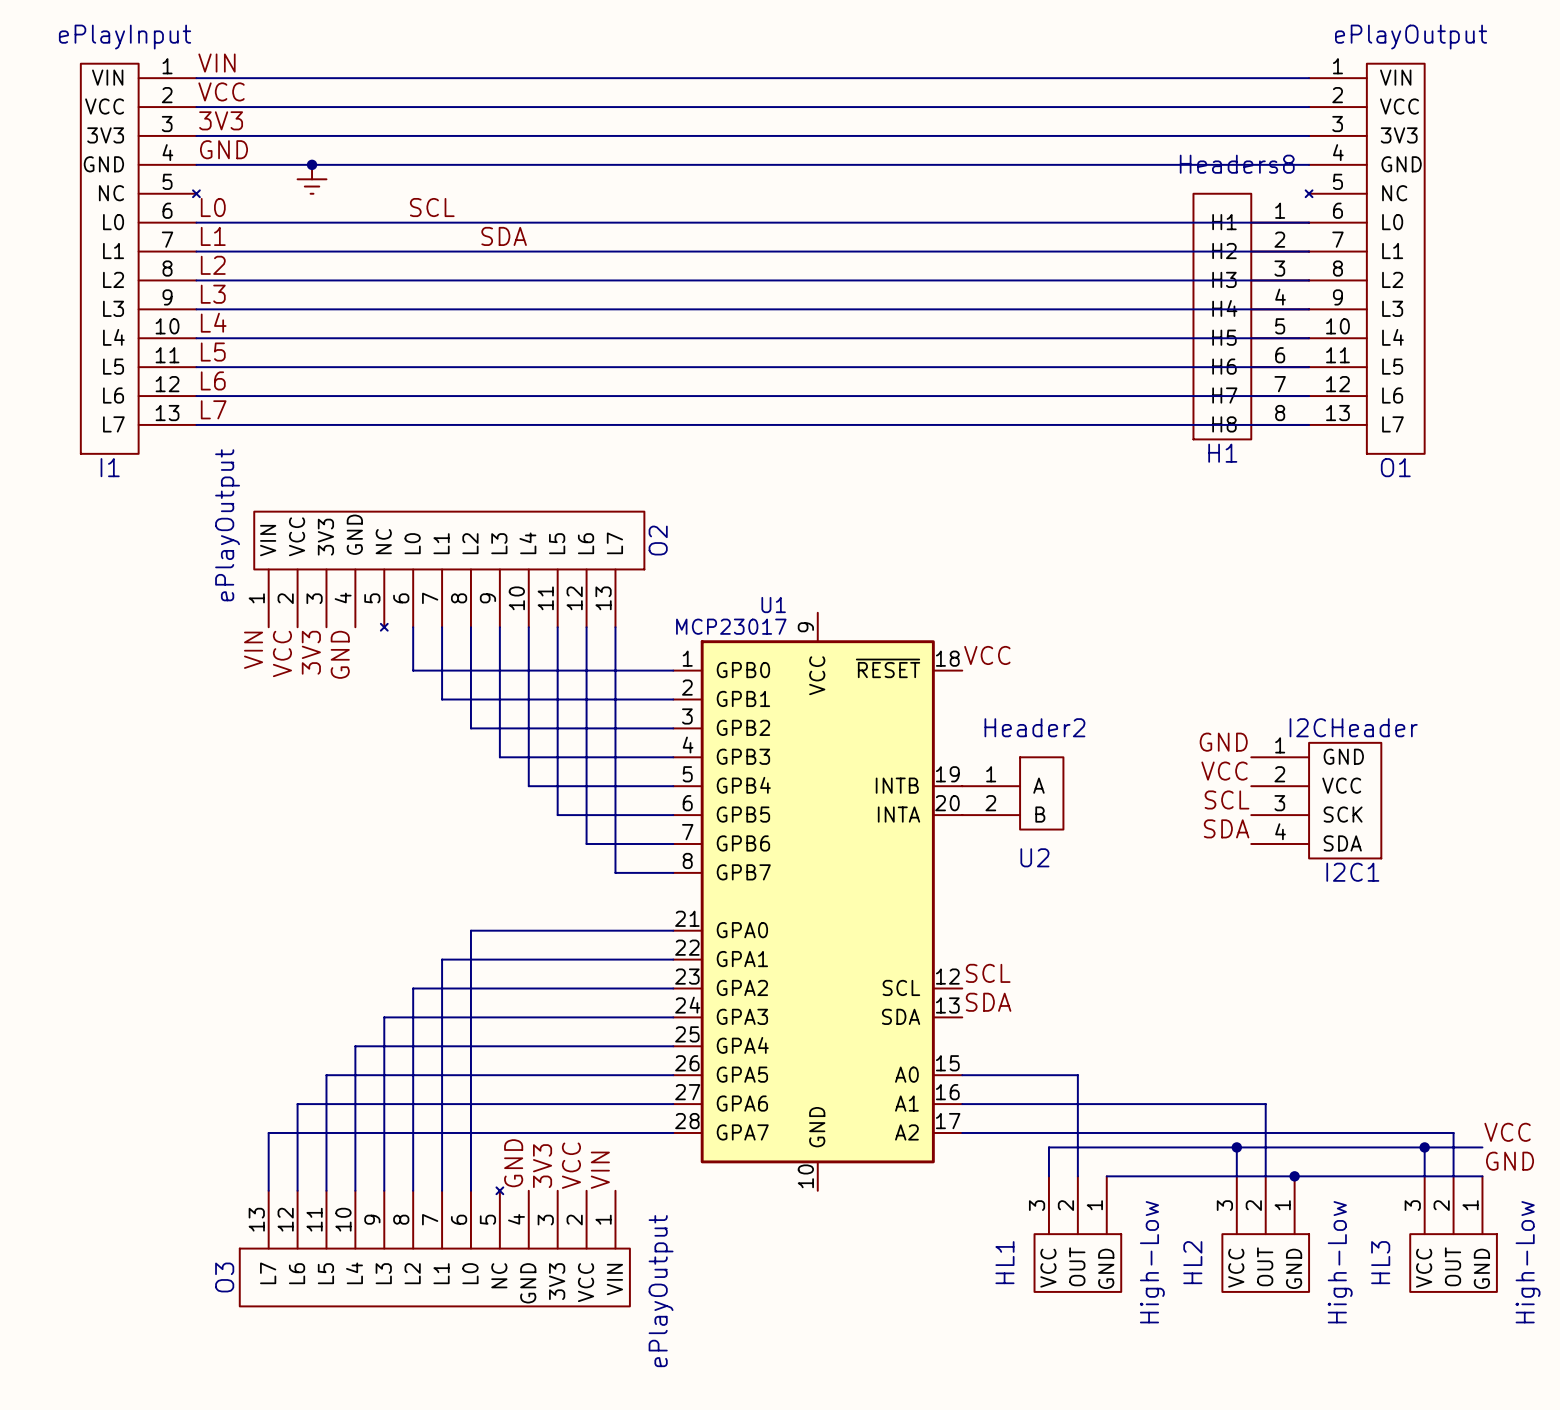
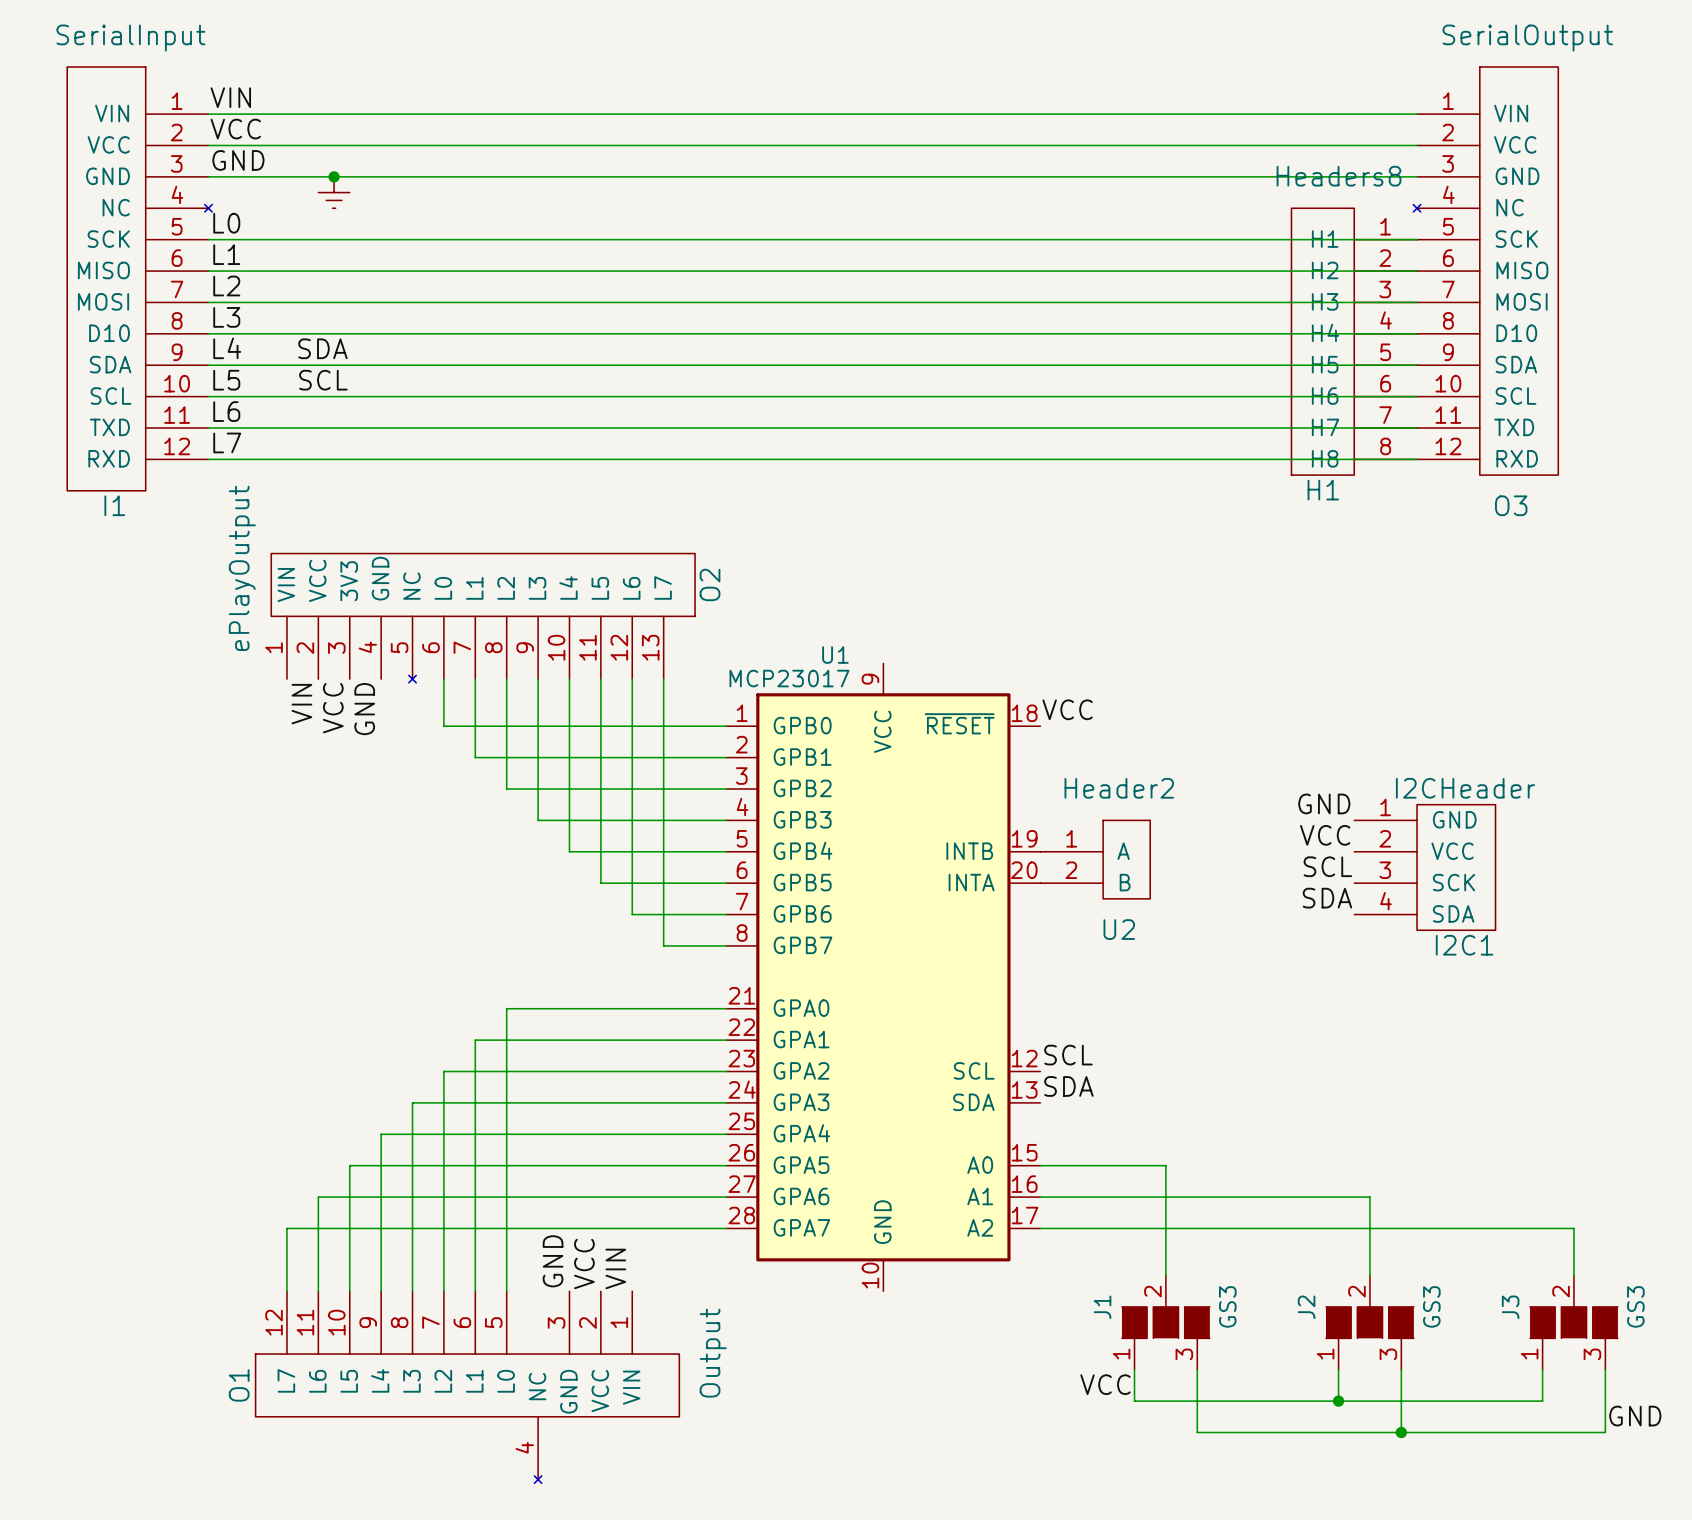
I1 value: ePlayInput (125, 37) -> SerialInput (130, 38)
O1 value: ePlayOutput (1411, 37) -> Output (713, 1353)
I1 symbol: [80, 63, 200, 454] -> [67, 67, 213, 491]
label: VIN (216, 63) -> none
O1 symbol: [1305, 63, 1425, 454] -> [255, 1291, 680, 1484]
wire: (196, 78) (1309, 78) -> none
label: VCC (221, 91) -> VIN (230, 97)
label: 3V3 (221, 120) -> VCC (235, 129)
label position: SCL (432, 207) -> SCL (323, 380)
label position: SDA (504, 236) -> SDA (322, 348)
O1 name position: O1 (1395, 467) -> O1 (239, 1385)
label: VIN (253, 650) -> none
label: 3V3 (311, 652) -> VCC (333, 708)
label: VCC (282, 653) -> VIN (301, 704)
label: VCC (1507, 1132) -> none
wire: (1236, 1147) (1236, 1176) -> (1338, 1369) (1338, 1401)
junction: (1236, 1147) -> none
wire: (1424, 1147) (1424, 1176) -> none
junction: (1424, 1147) -> none
wire: (1482, 1147) (1048, 1147) (1048, 1176) -> none
label position: GND (1510, 1161) -> GND (1635, 1416)
label: VCC (571, 1165) -> VIN (615, 1268)
label: 3V3 (542, 1166) -> VCC (584, 1264)
label: VIN (600, 1170) -> none
wire: (1106, 1176) (1482, 1176) -> none
junction: (1294, 1176) -> none
O3 symbol: [239, 1187, 630, 1307] -> [1413, 67, 1559, 476]
J1: none -> GS3 (1165, 1322)
J2: none -> GS3 (1369, 1322)
J3: none -> GS3 (1573, 1322)
HL1: High-Low (1077, 1234) -> none
HL2: High-Low (1265, 1234) -> none
HL3: High-Low (1453, 1234) -> none
wire: none -> (1134, 1369) (1134, 1401) (1542, 1401) (1542, 1369)
wire: none -> (1197, 1369) (1197, 1432) (1605, 1432) (1605, 1369)
wire: none -> (1401, 1369) (1401, 1432)
label: none -> VCC (1105, 1384)
O3 name position: O3 (224, 1277) -> O3 (1511, 505)
O3 value: ePlayOutput (661, 1291) -> SerialOutput (1527, 38)
junction: none -> (1338, 1401)
junction: none -> (1401, 1432)

